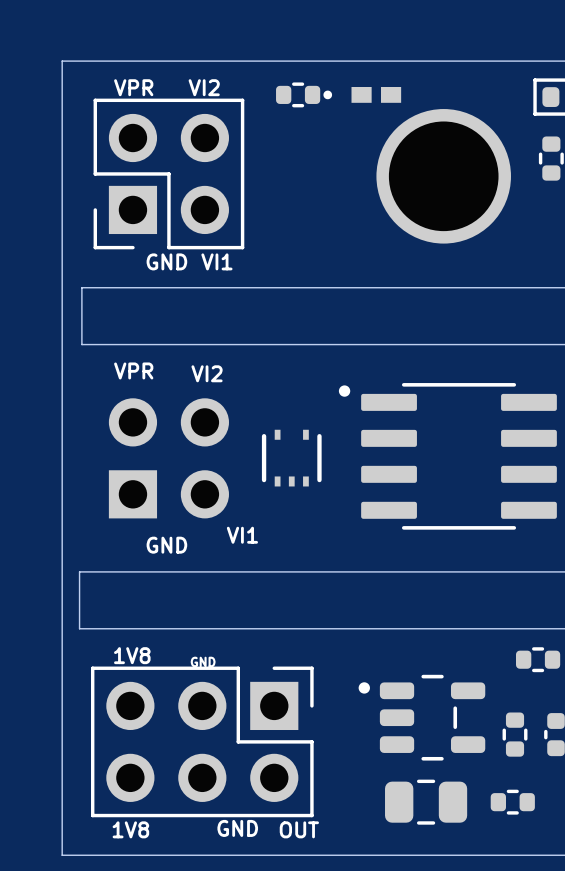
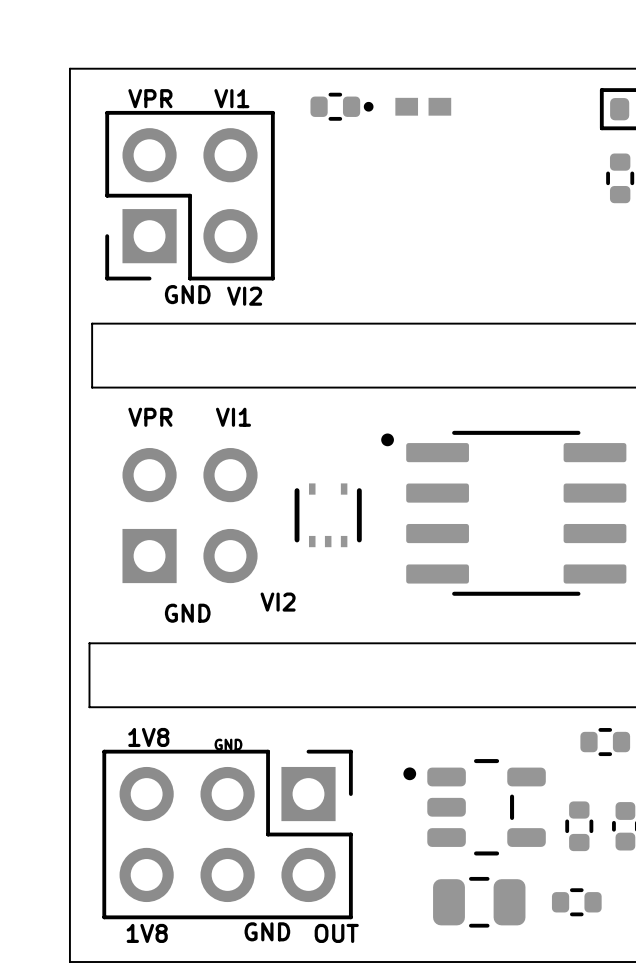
text: VI2 (204, 87) -> VI1 (231, 98)
part: (443, 176) -> none
text: VI1 (216, 261) -> VI2 (244, 296)
text: VI2 (207, 373) -> VI1 (233, 417)
text: VI1 (242, 535) -> VI2 (278, 602)

